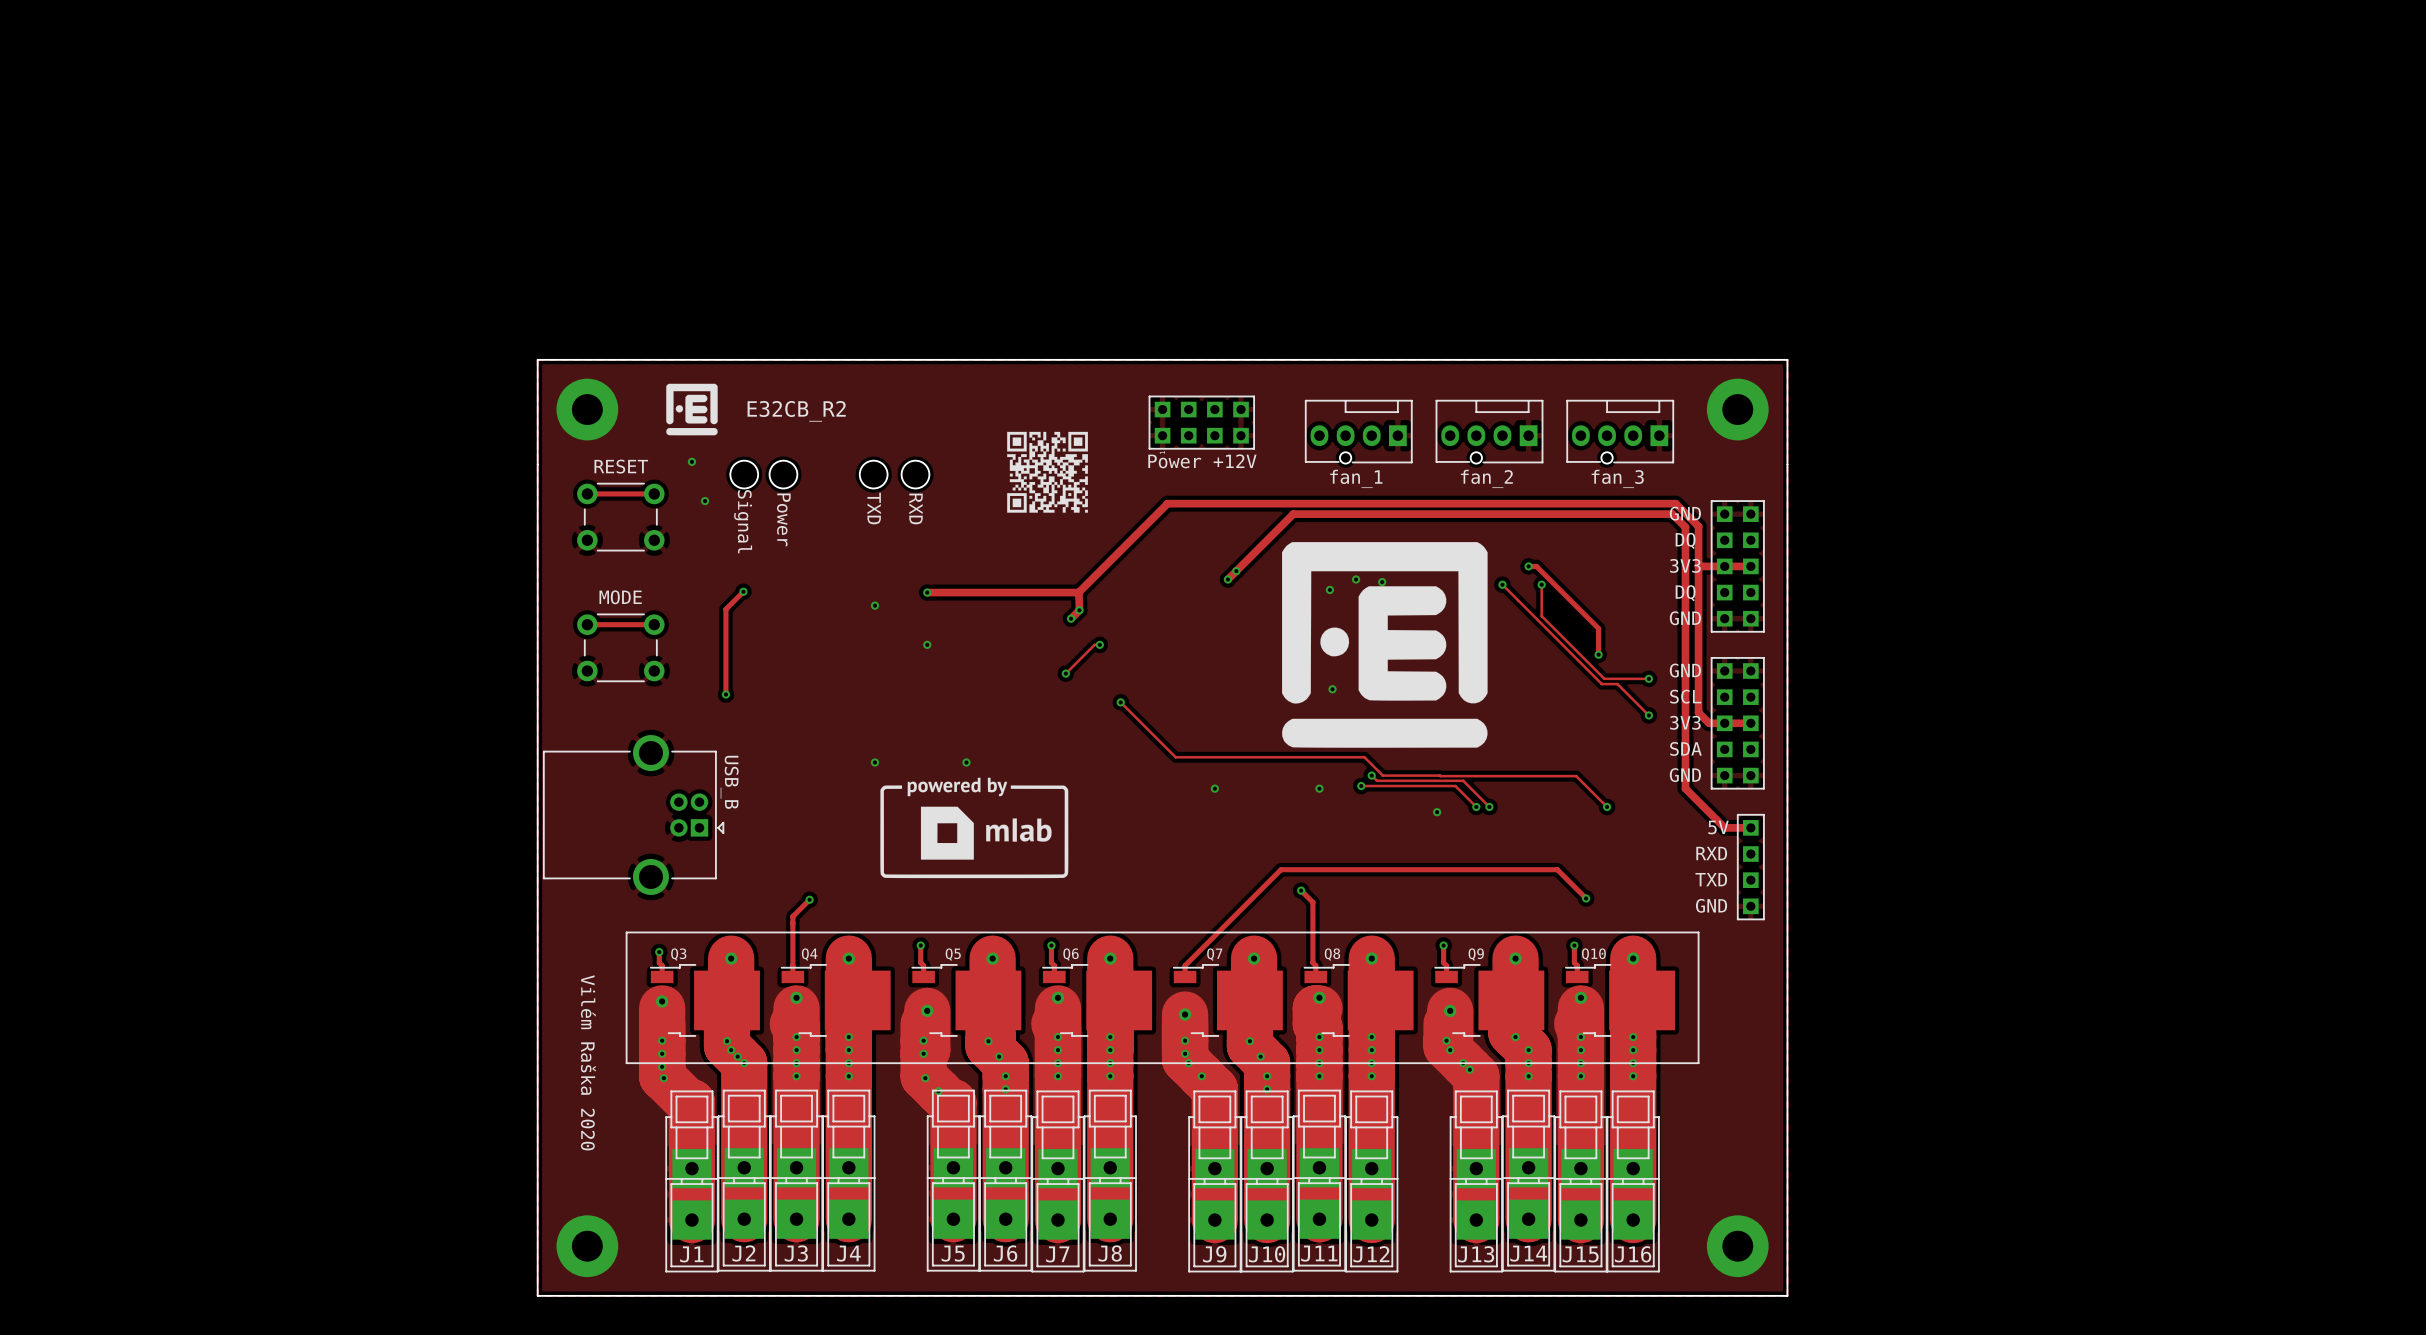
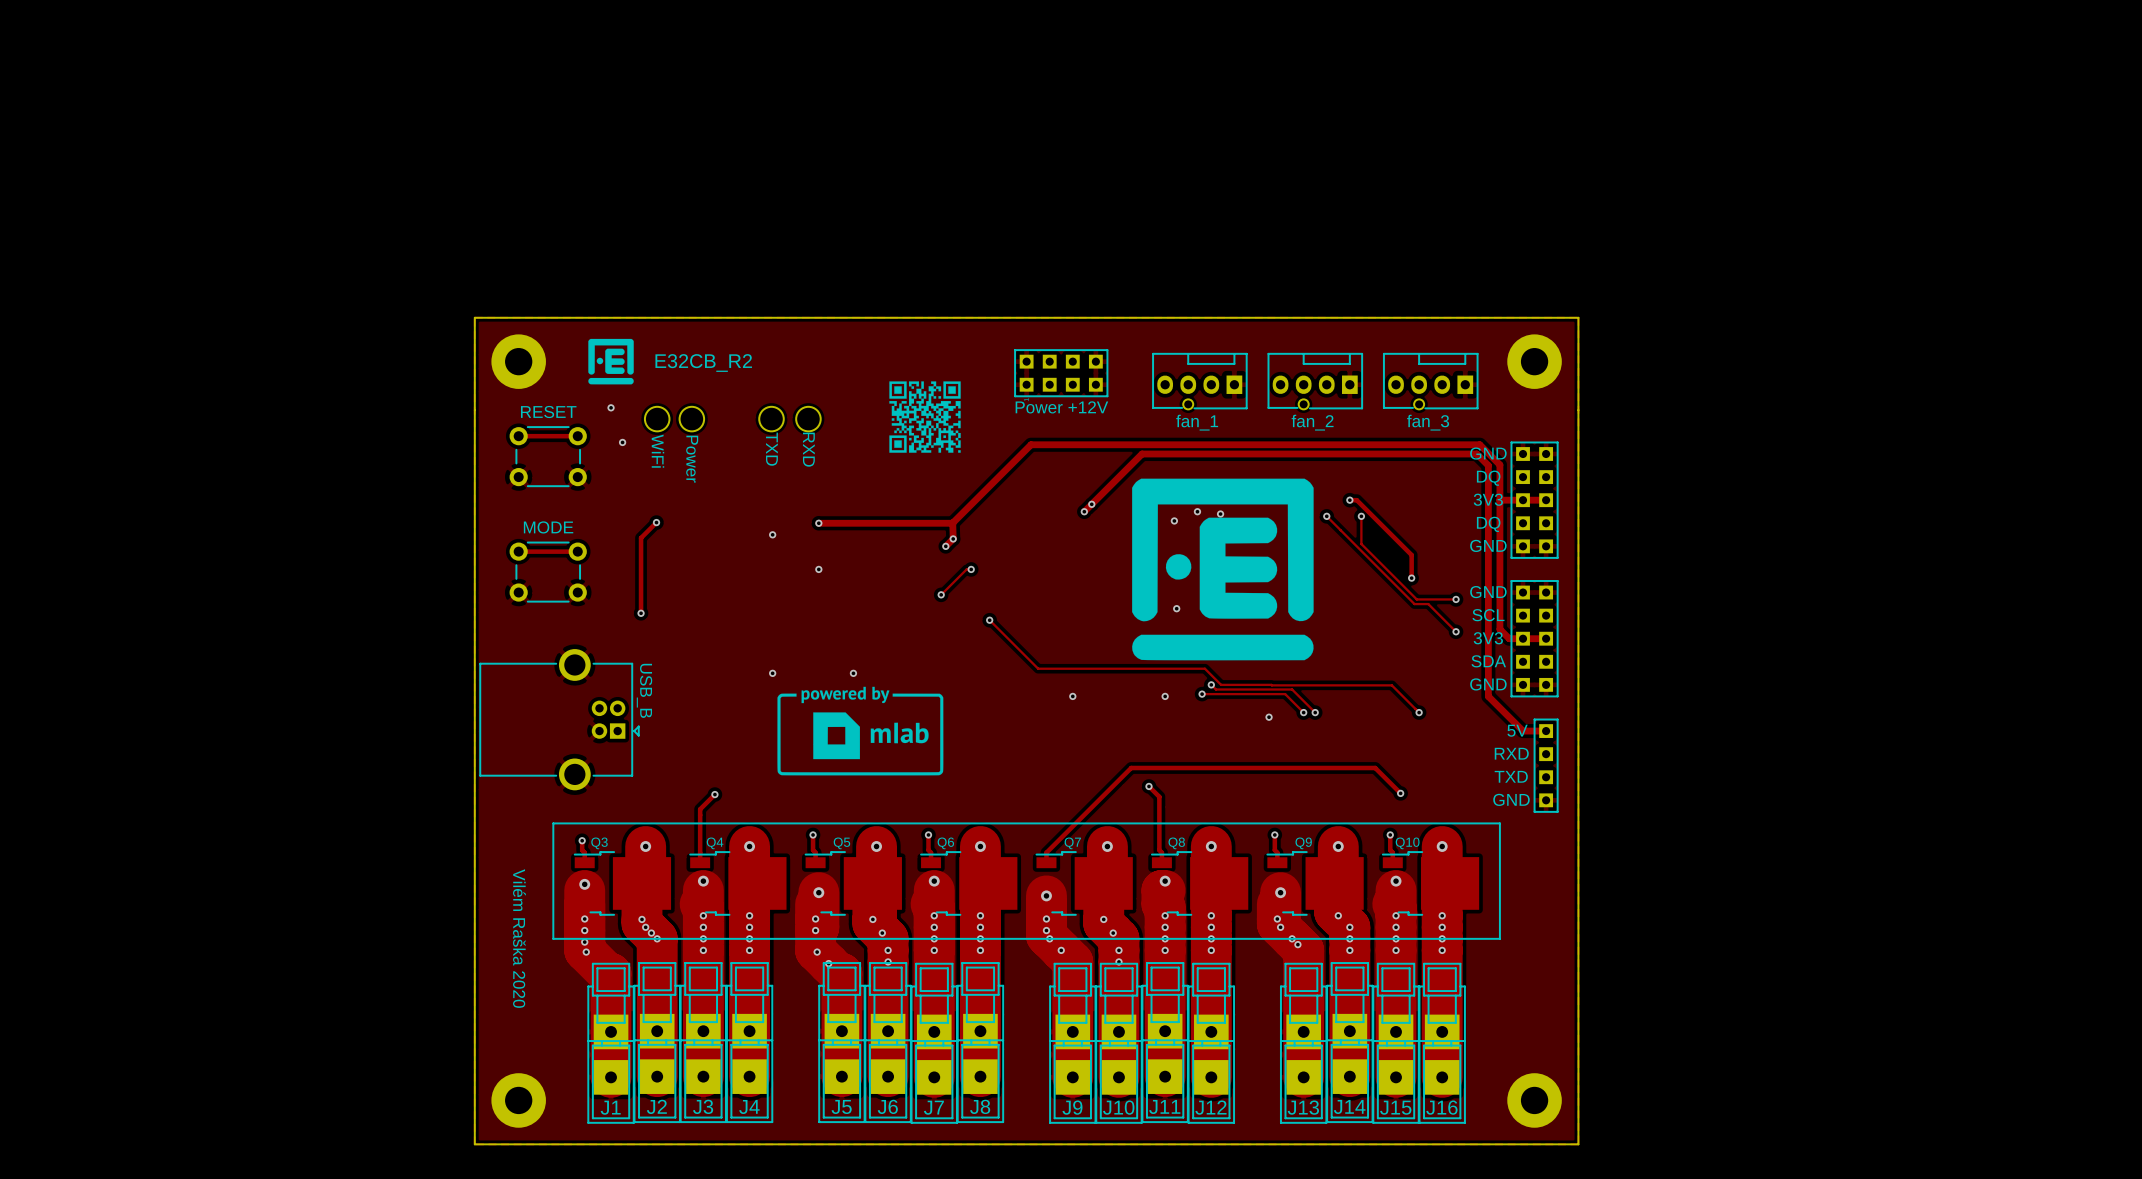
Signal name: Signal (743, 521) -> WiFi (657, 451)

